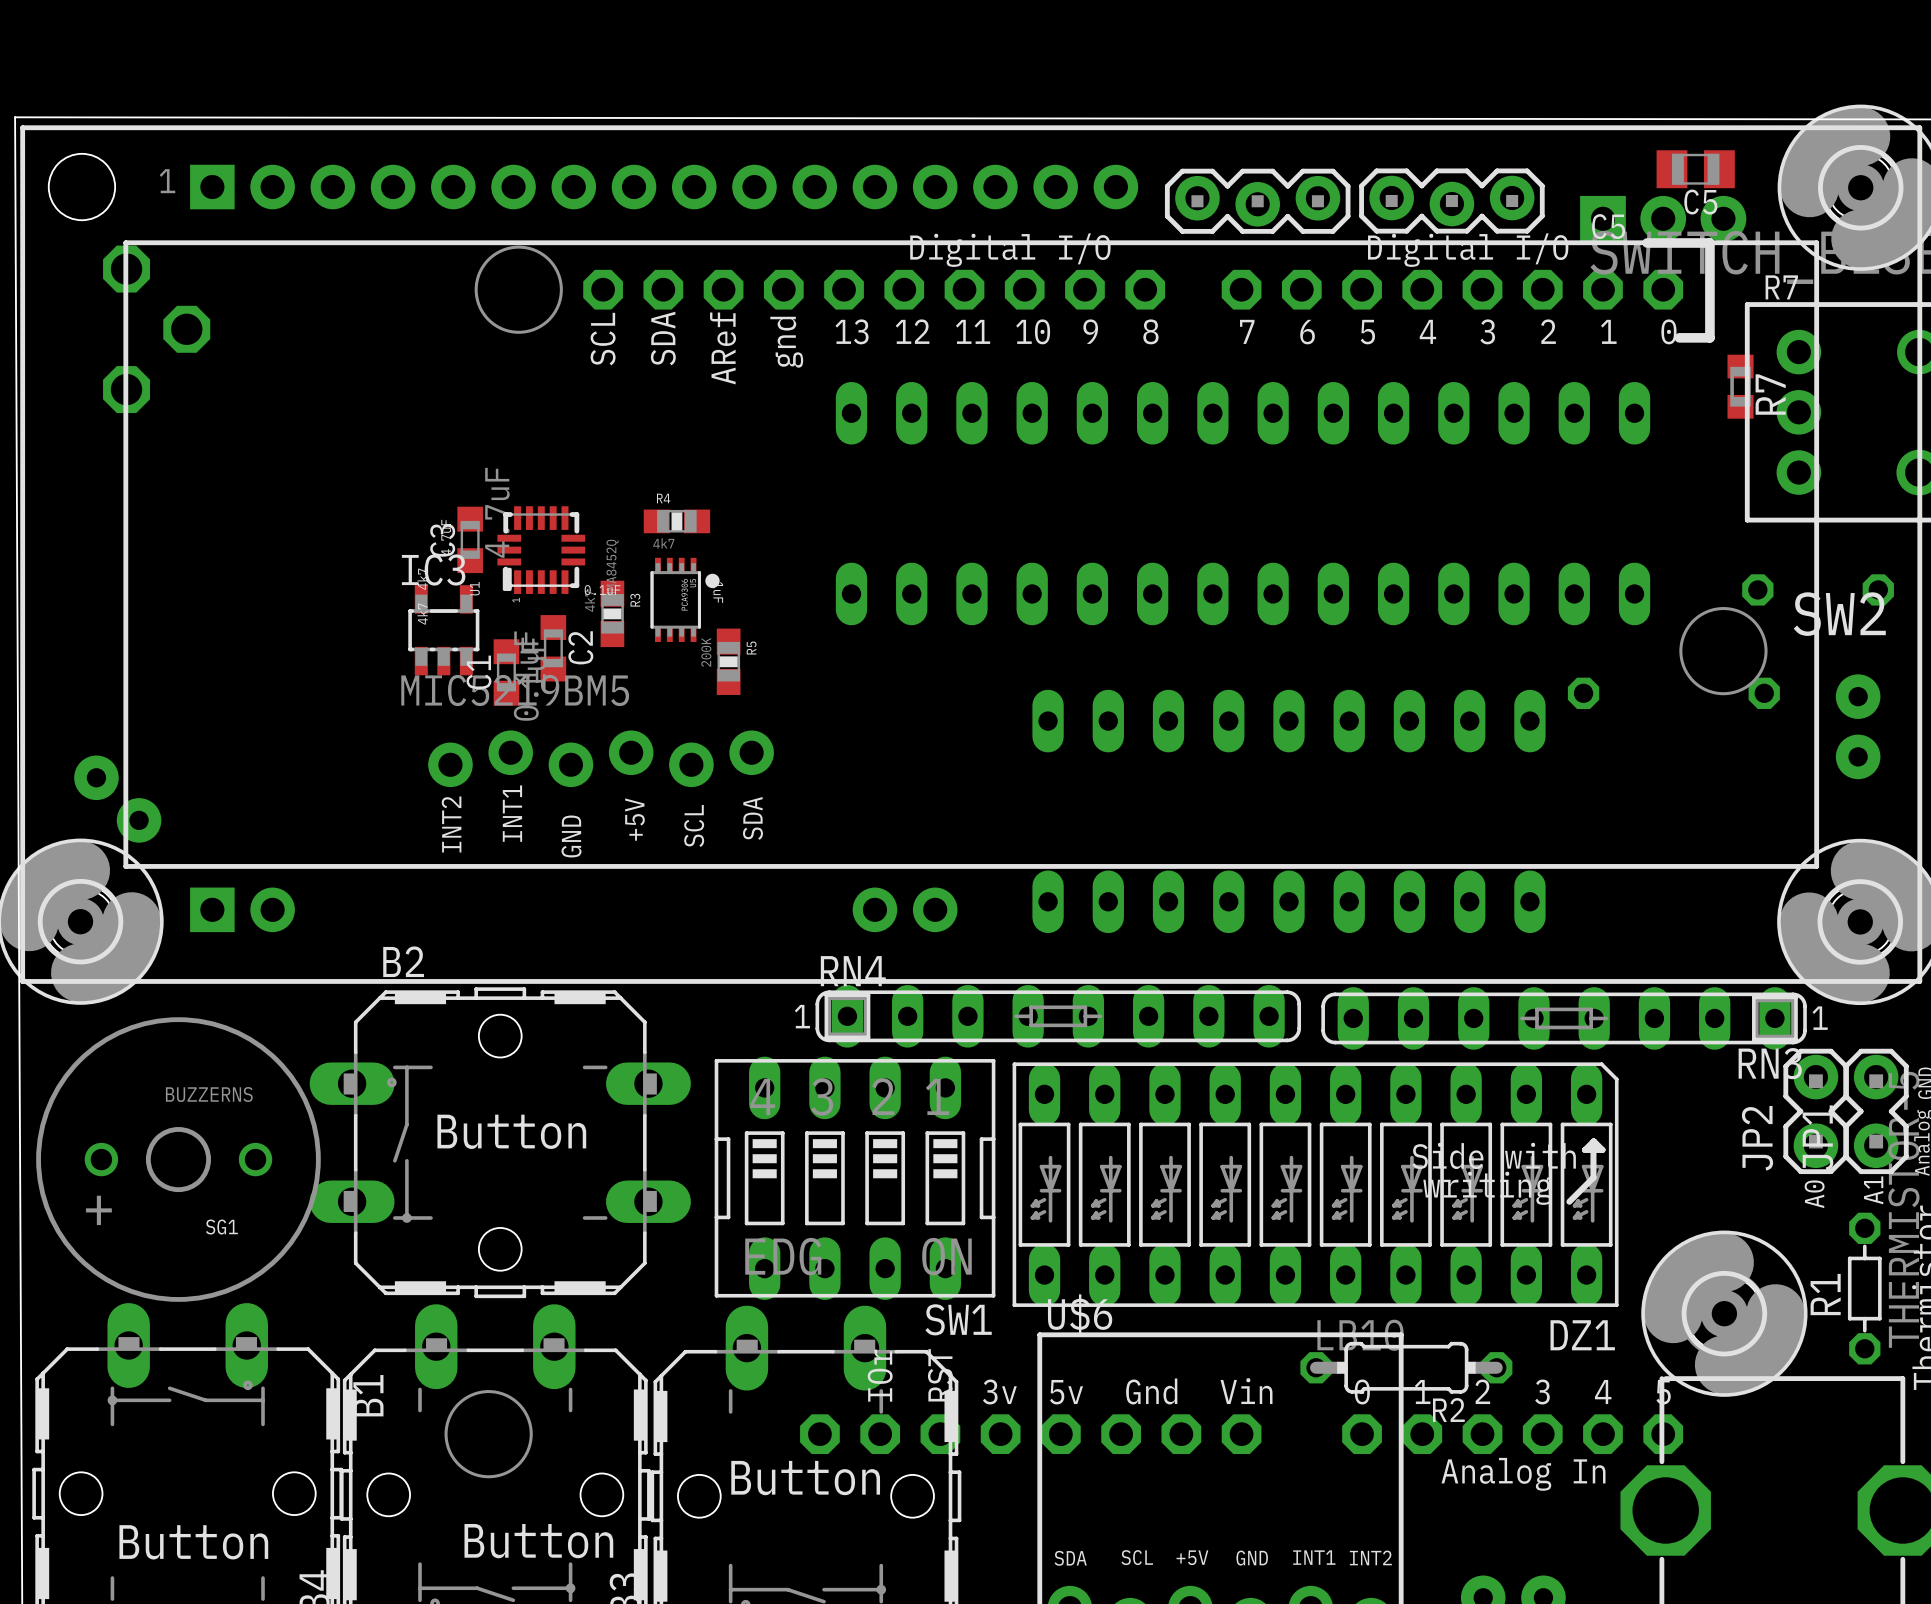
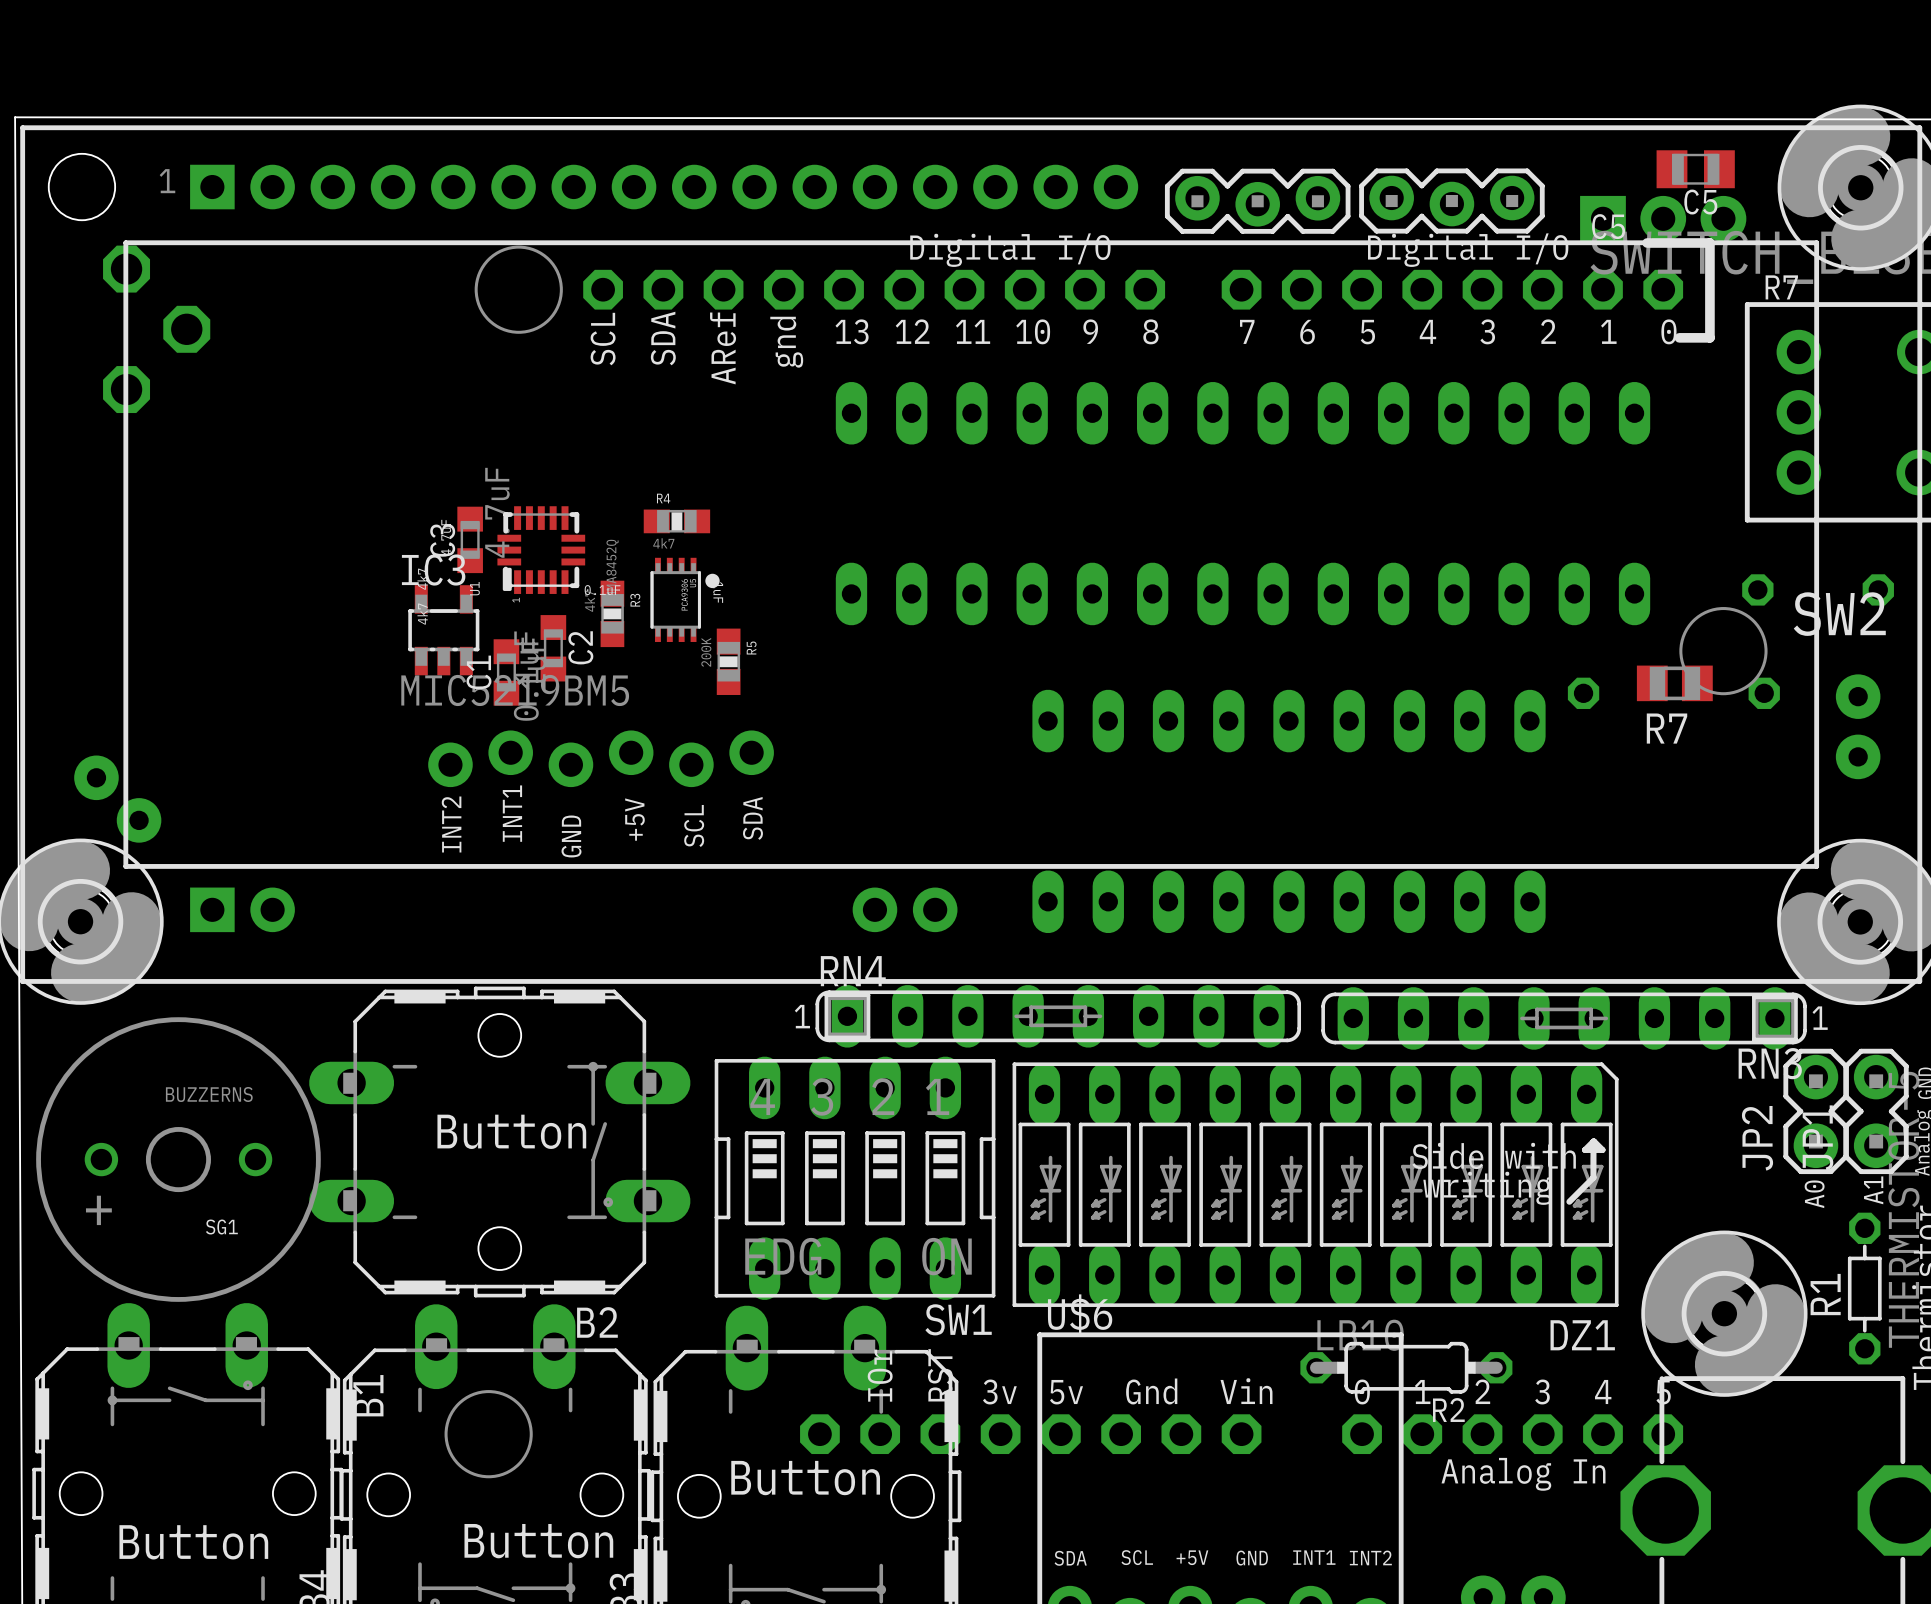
R7 footprint: [1727, 354, 1754, 419] -> [1636, 665, 1713, 702]
R7 name position: R7 (1770, 394) -> R7 (1667, 728)
B2 name position: B2 (403, 961) -> B2 (597, 1322)
B2 footprint: [309, 987, 691, 1299] -> [309, 986, 691, 1298]

